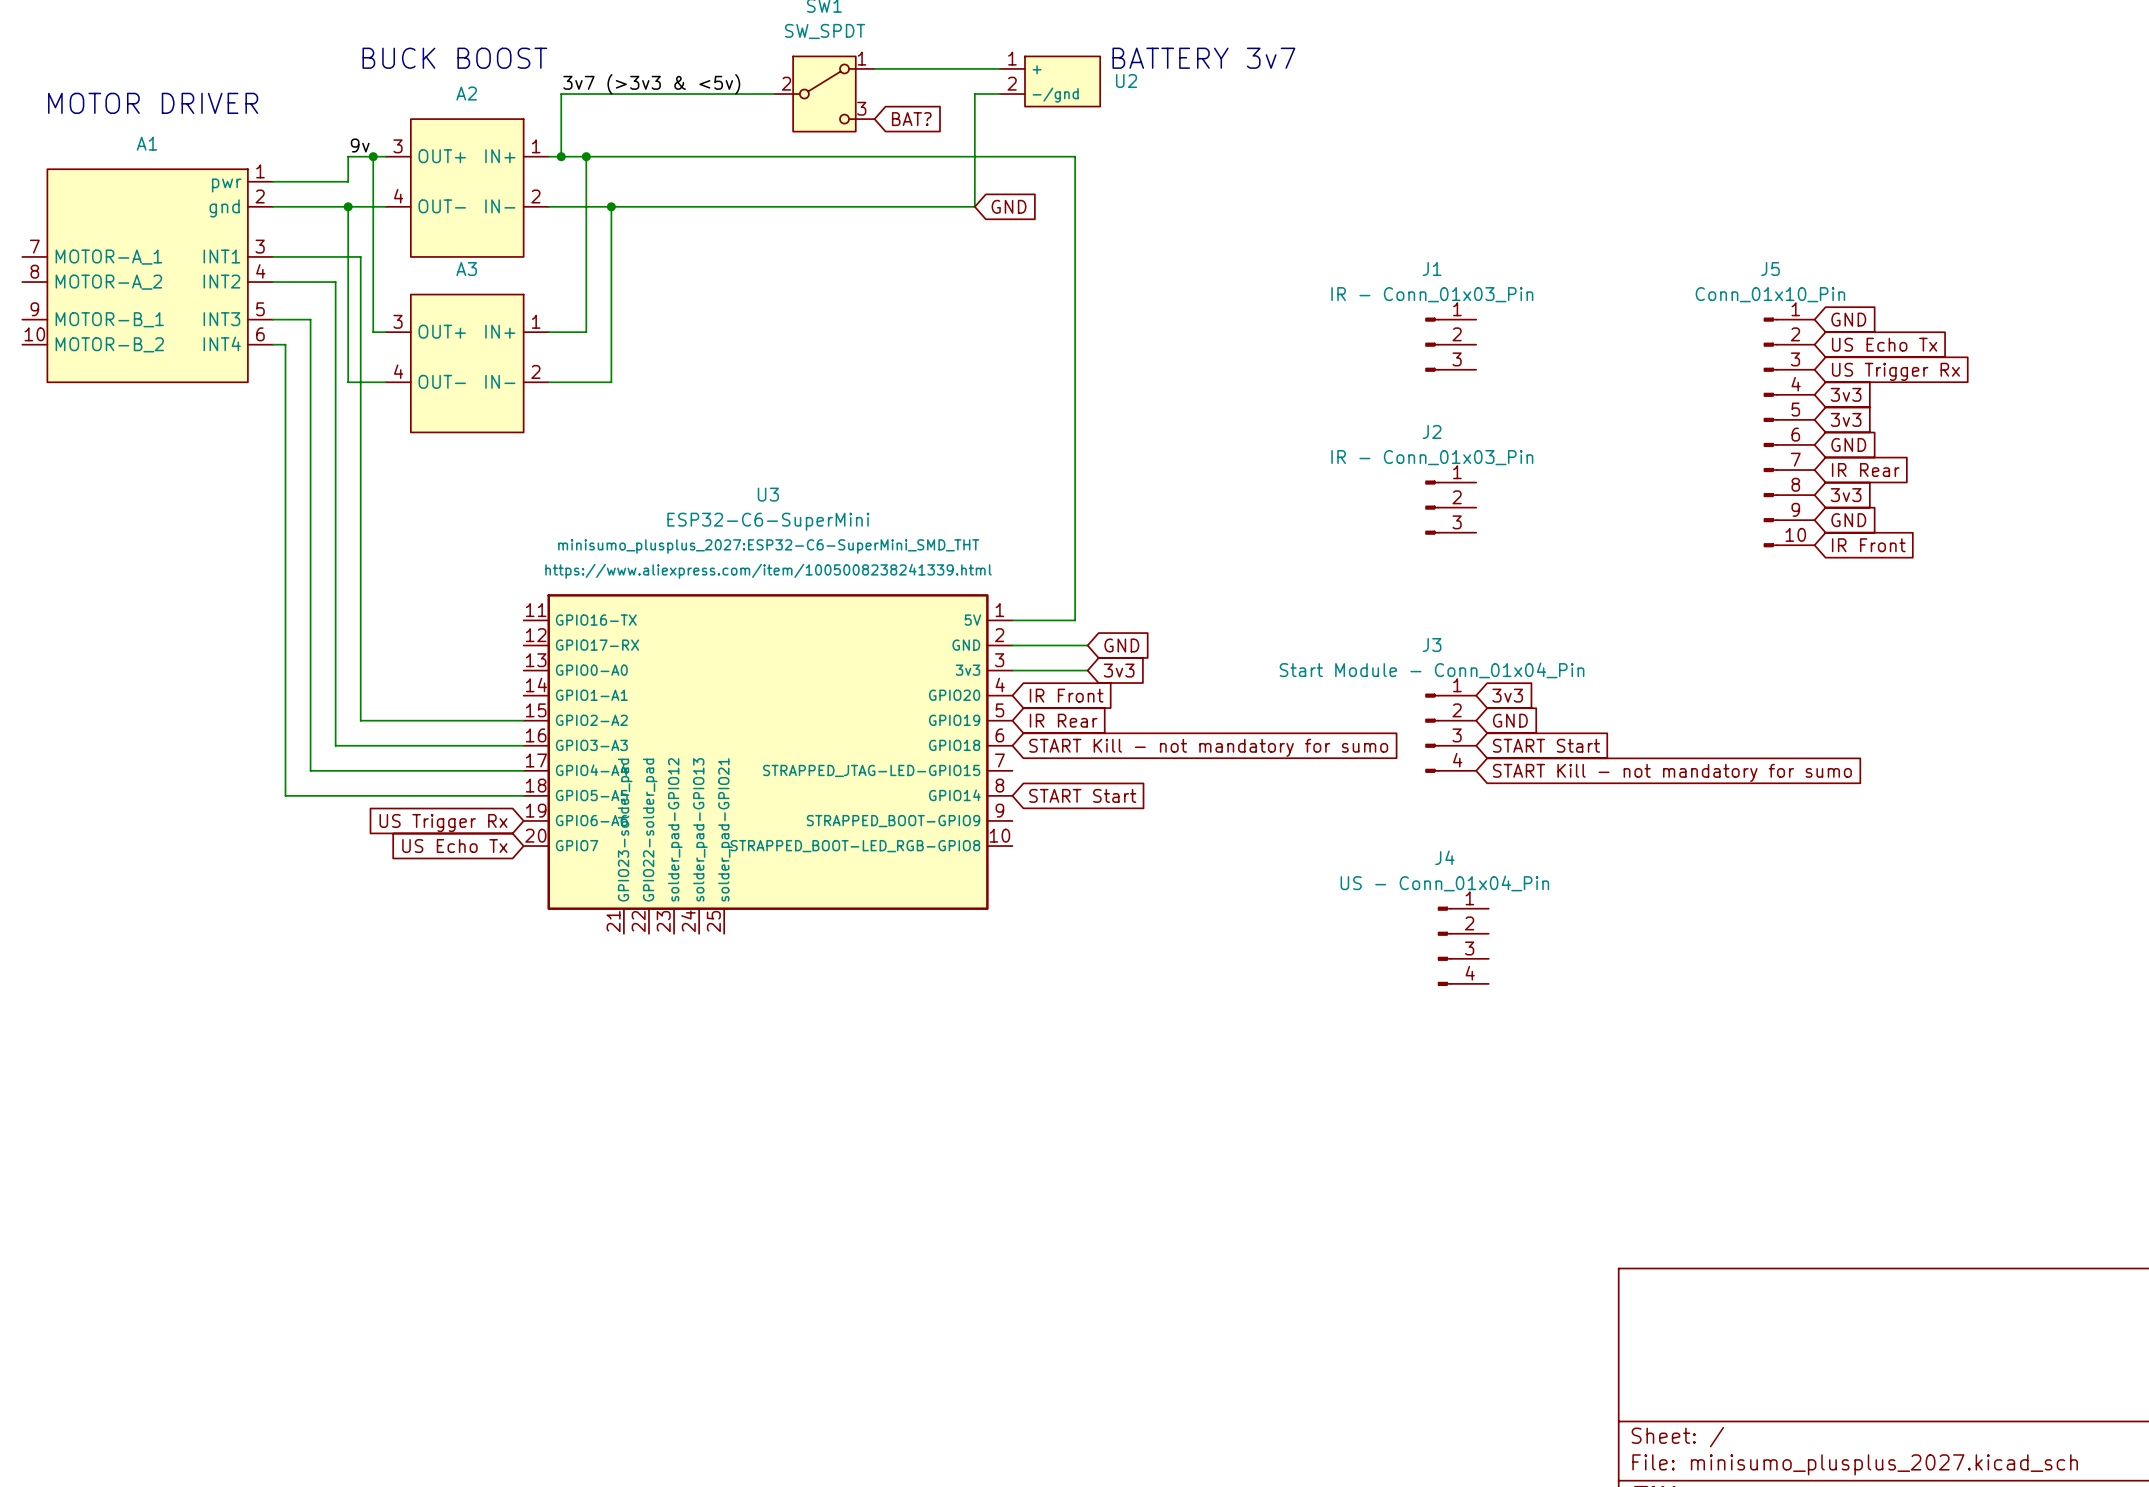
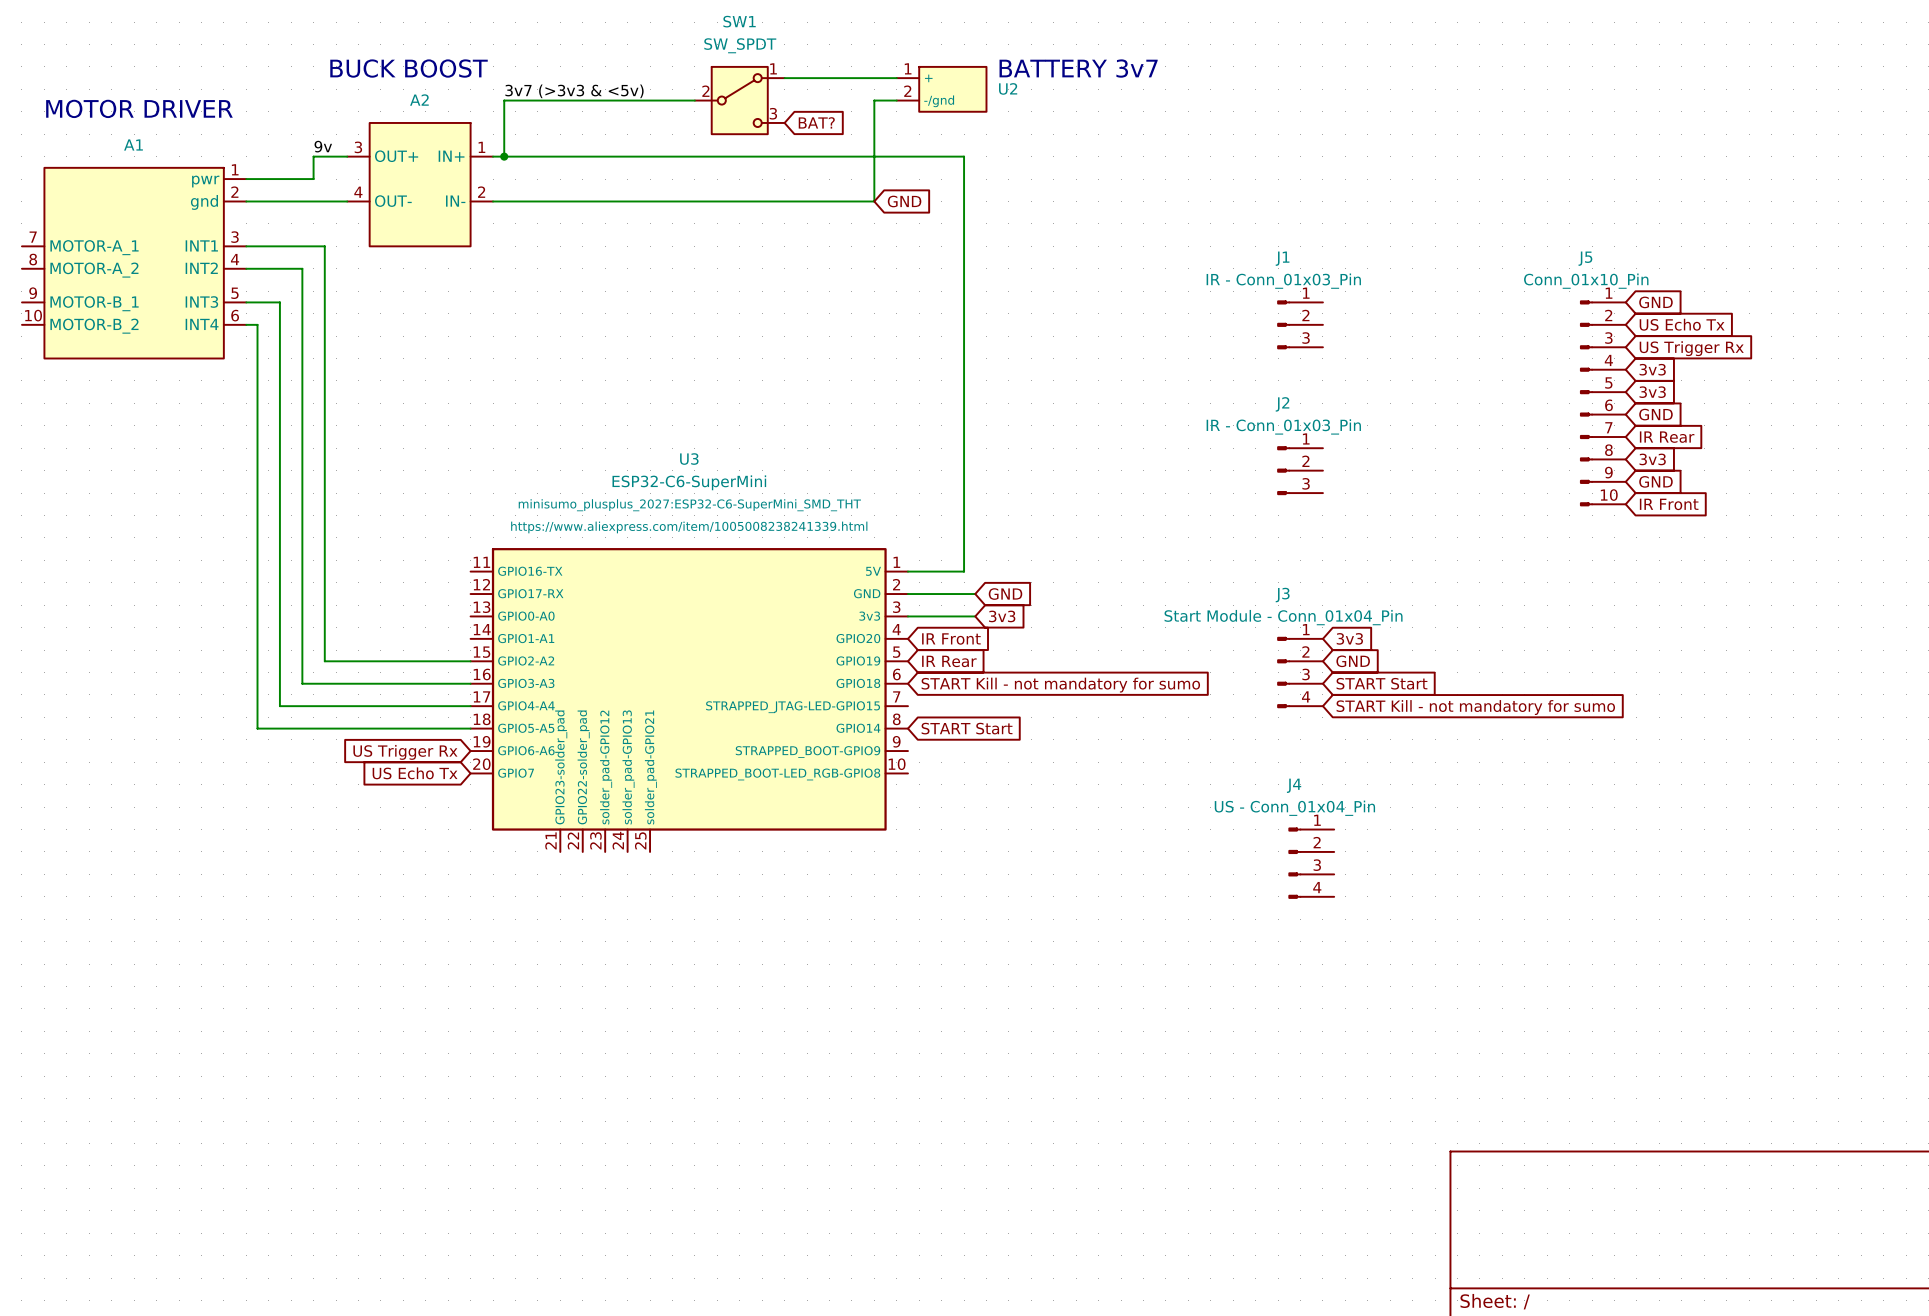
wire: (373, 156) (373, 332) (385, 332) -> none
junction: (373, 156) -> none
wire: (586, 156) (586, 332) (548, 332) -> none
junction: (586, 156) -> none
wire: (348, 206) (348, 382) (385, 382) -> none
junction: (348, 206) -> none
wire: (611, 206) (611, 382) (548, 382) -> none
junction: (611, 206) -> none
A3: (467, 363) -> none

